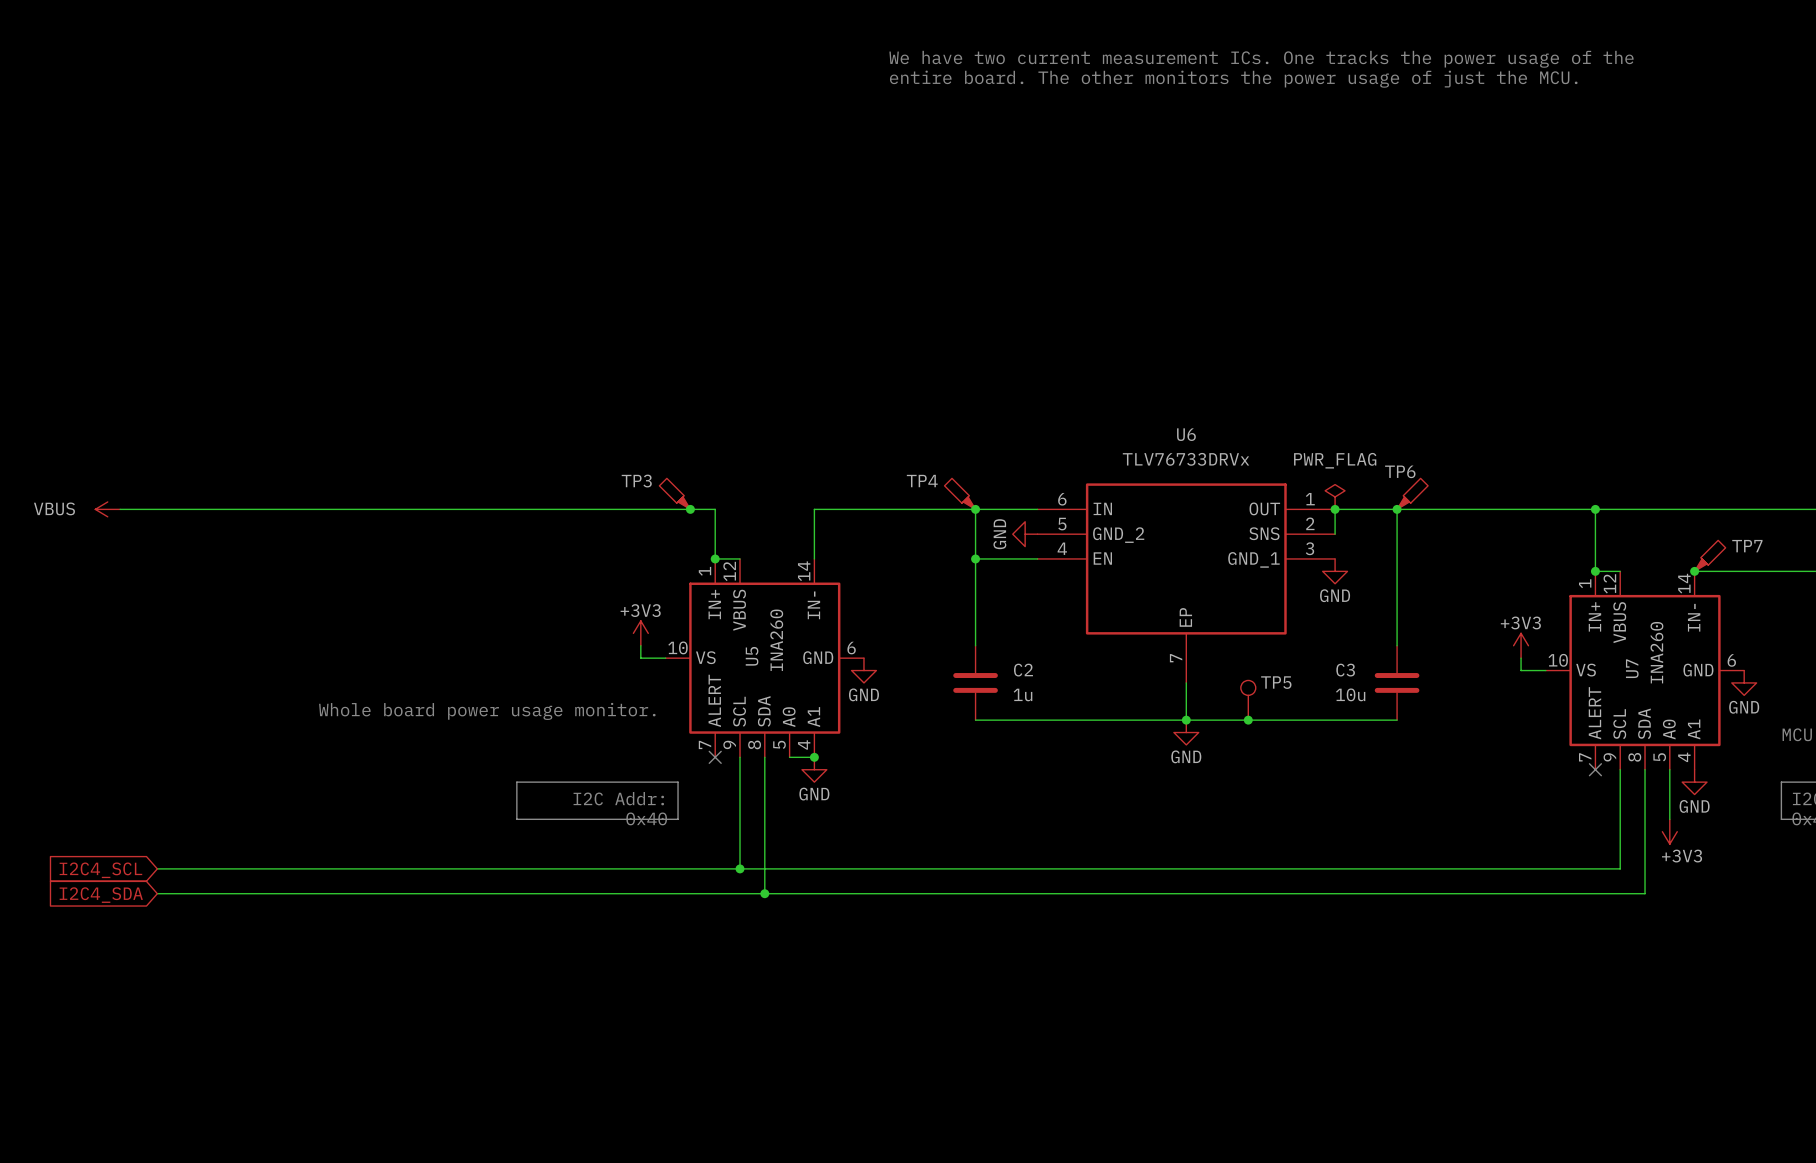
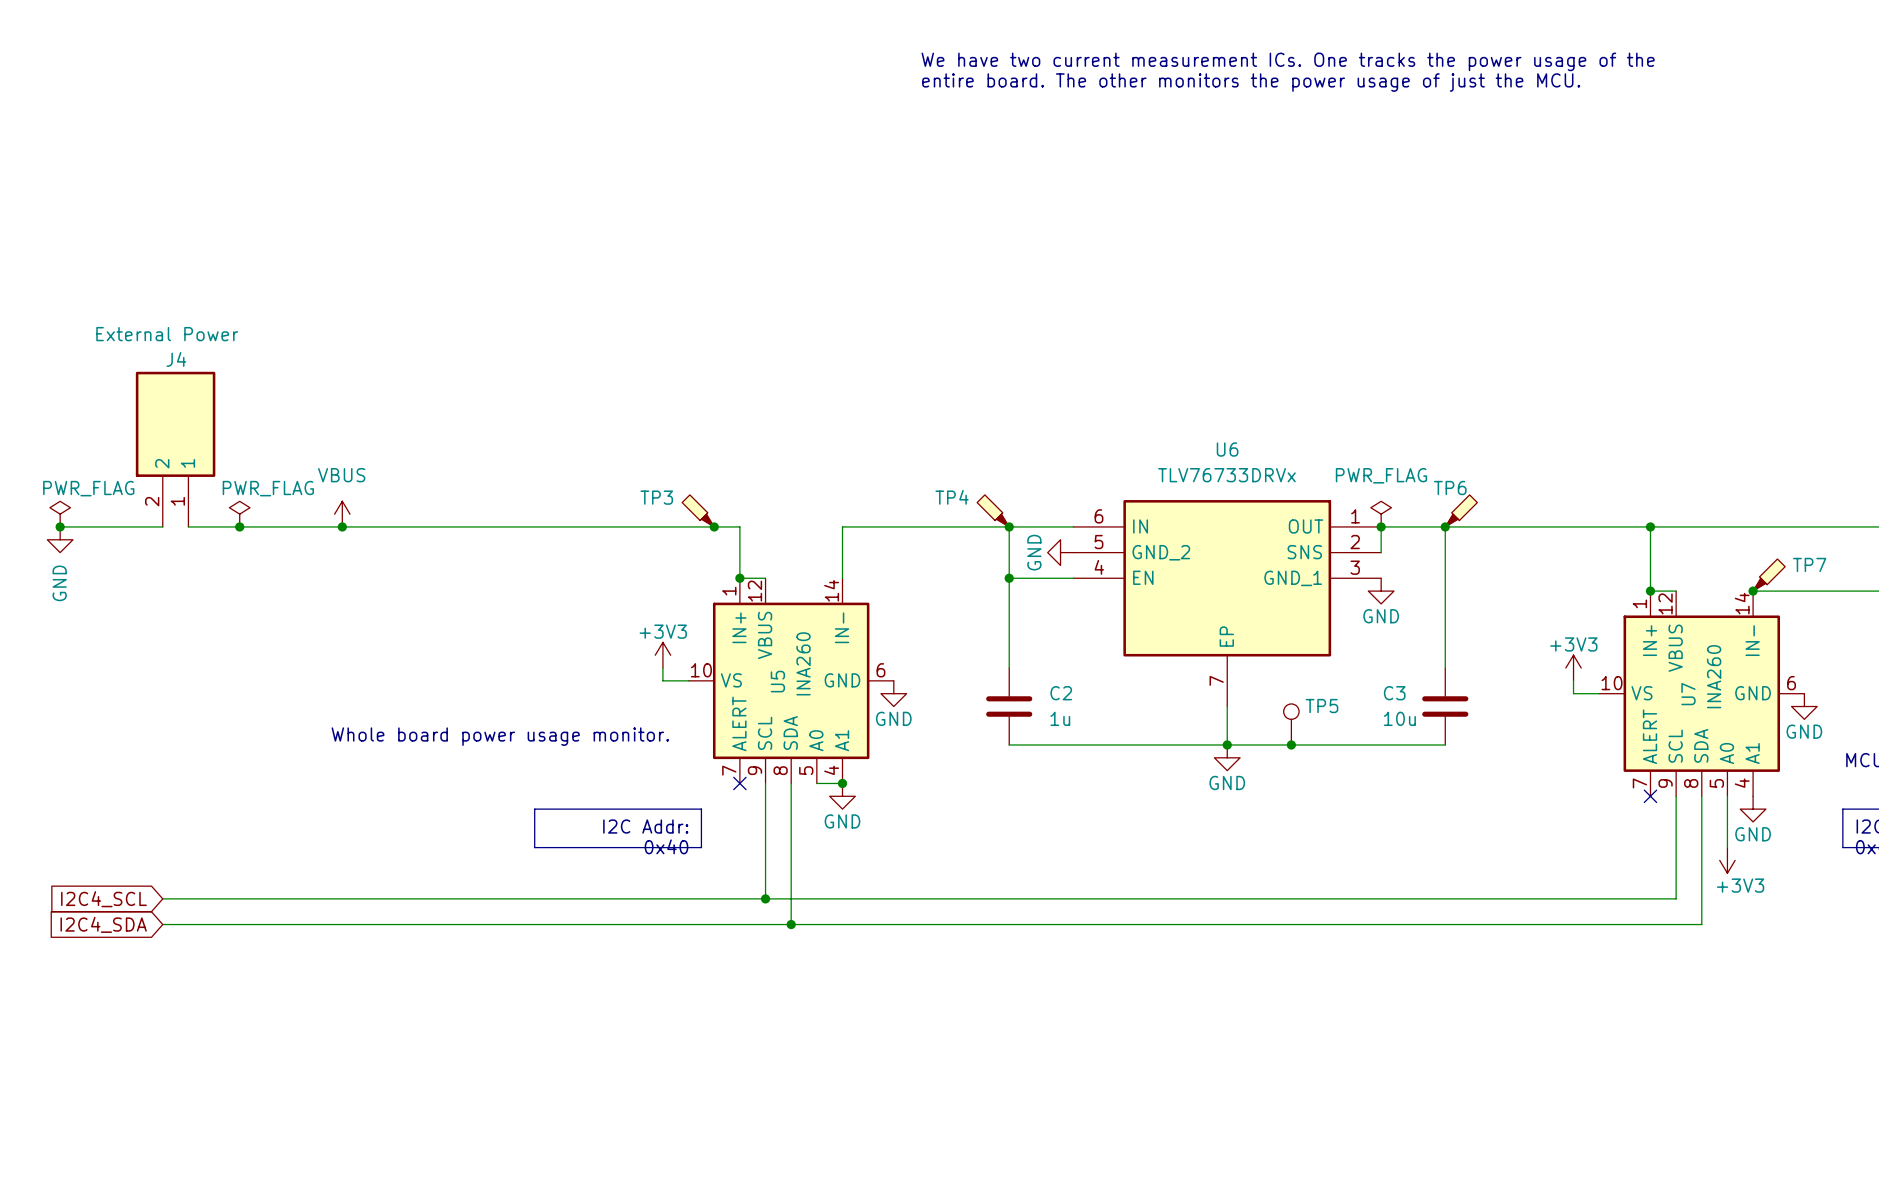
J4: none -> External Power (175, 449)
power symbol: none -> PWR_FLAG (60, 514)
power symbol: none -> PWR_FLAG (239, 514)
wire: none -> (60, 526) (124, 526)
junction: none -> (60, 526)
power symbol rotation: 0° (107, 509) -> 90° clockwise (342, 514)
power symbol position: VBUS (107, 509) -> VBUS (342, 514)
wire: (157, 509) (182, 509) -> none
junction: none -> (239, 526)
junction: none -> (342, 526)
power symbol: none -> GND (60, 539)

